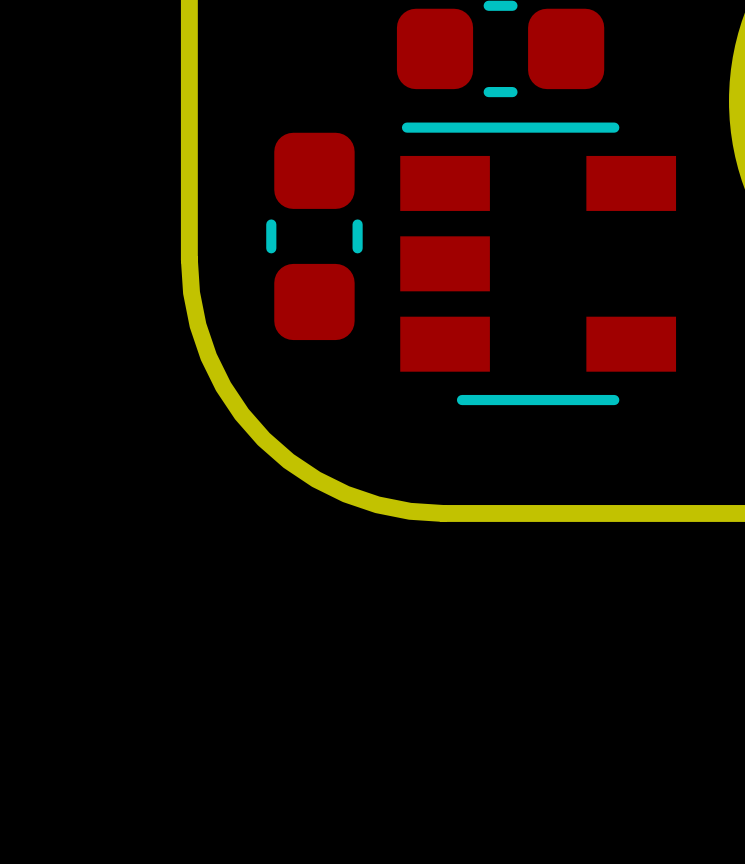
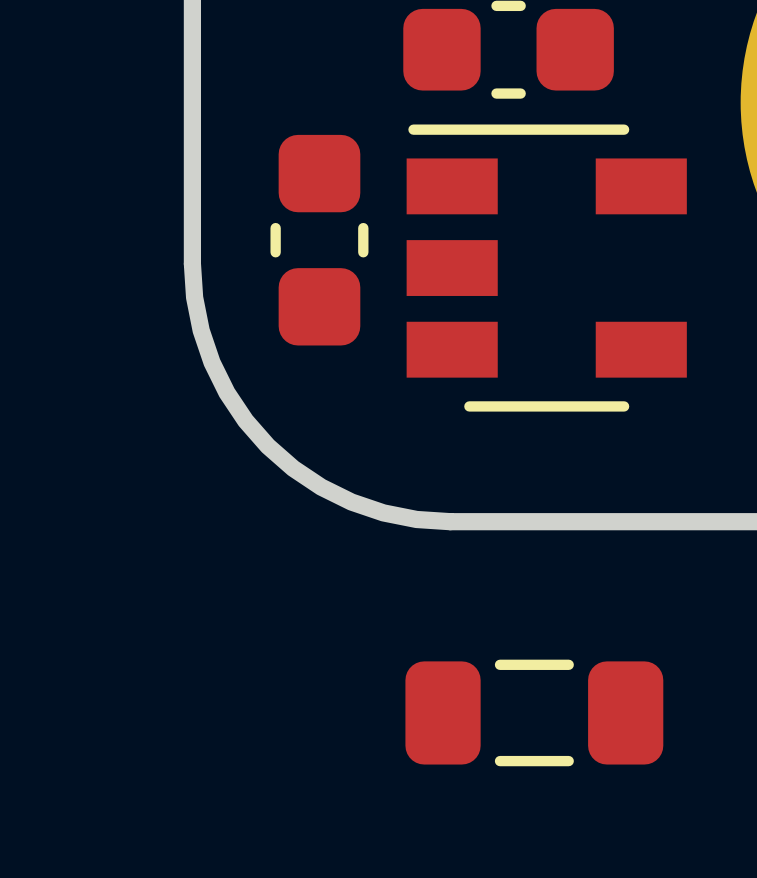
part: none -> (534, 712)

